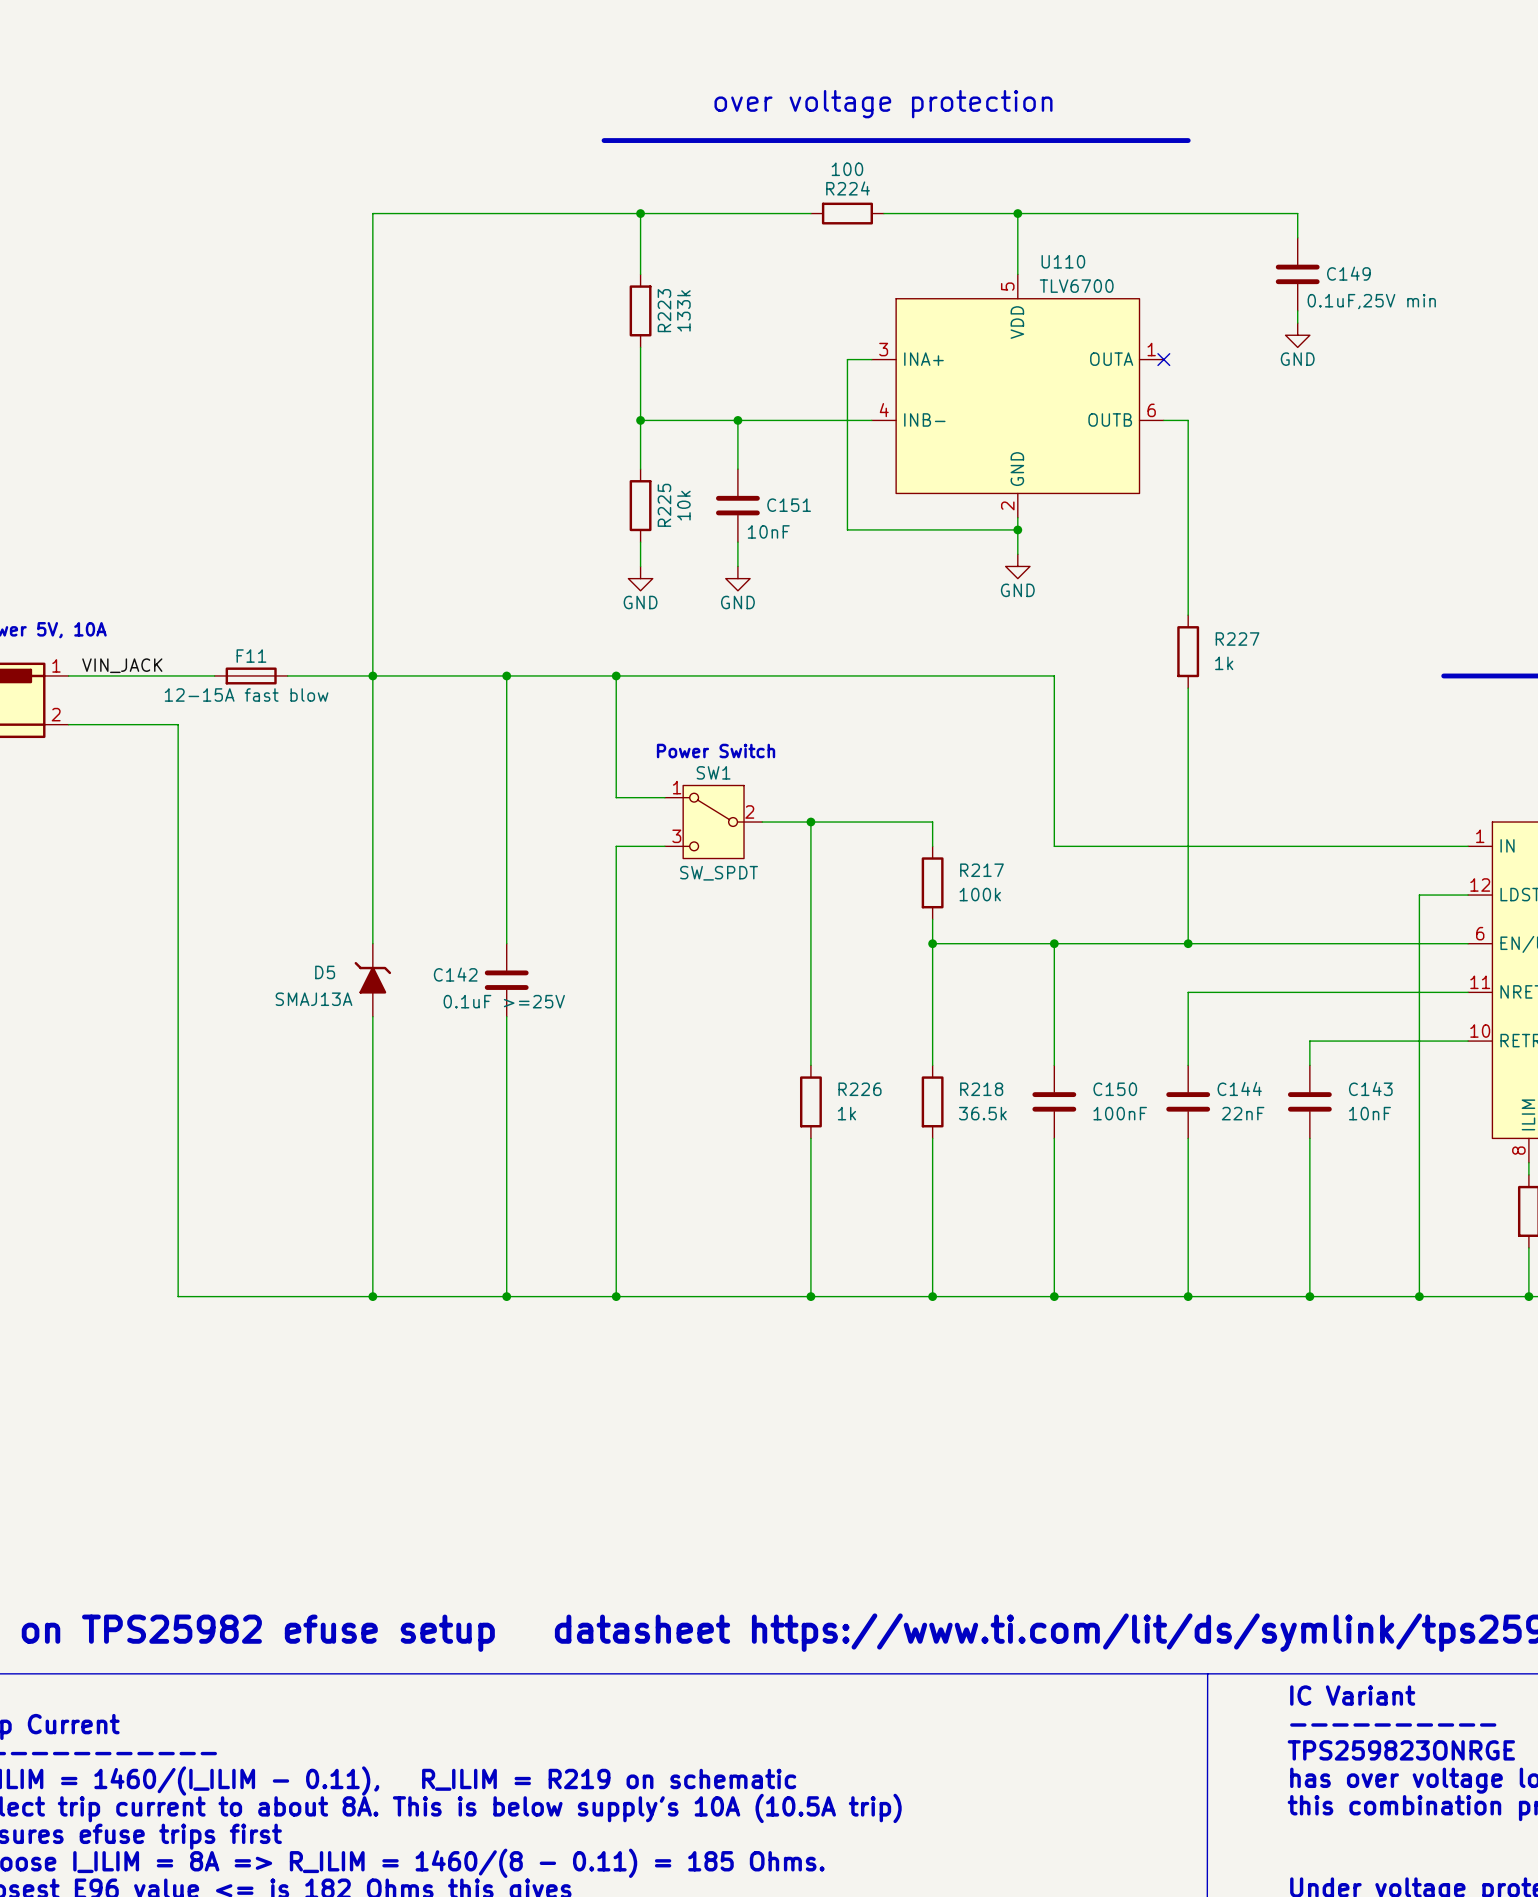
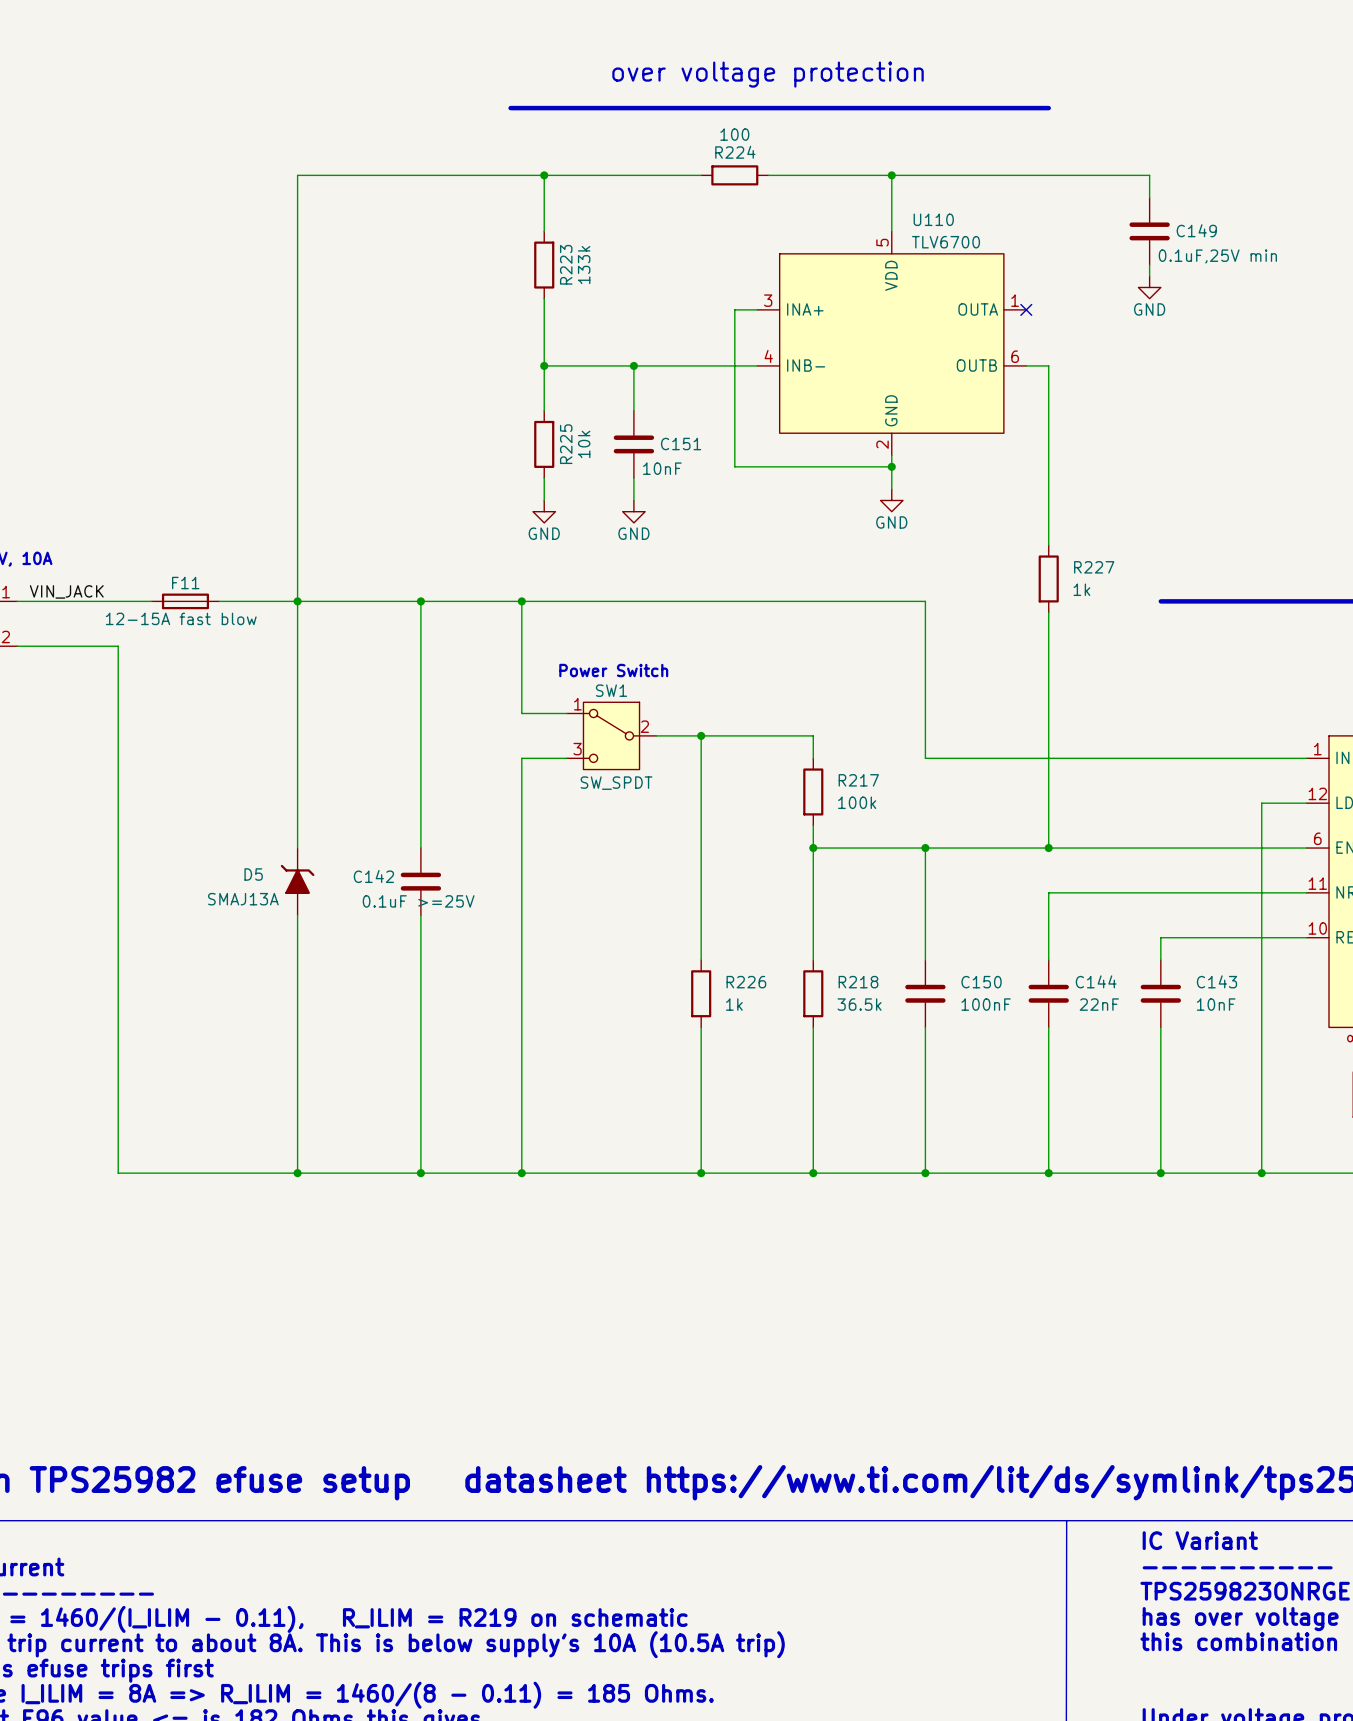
line: none -> (1160, 601) (1284, 601)

